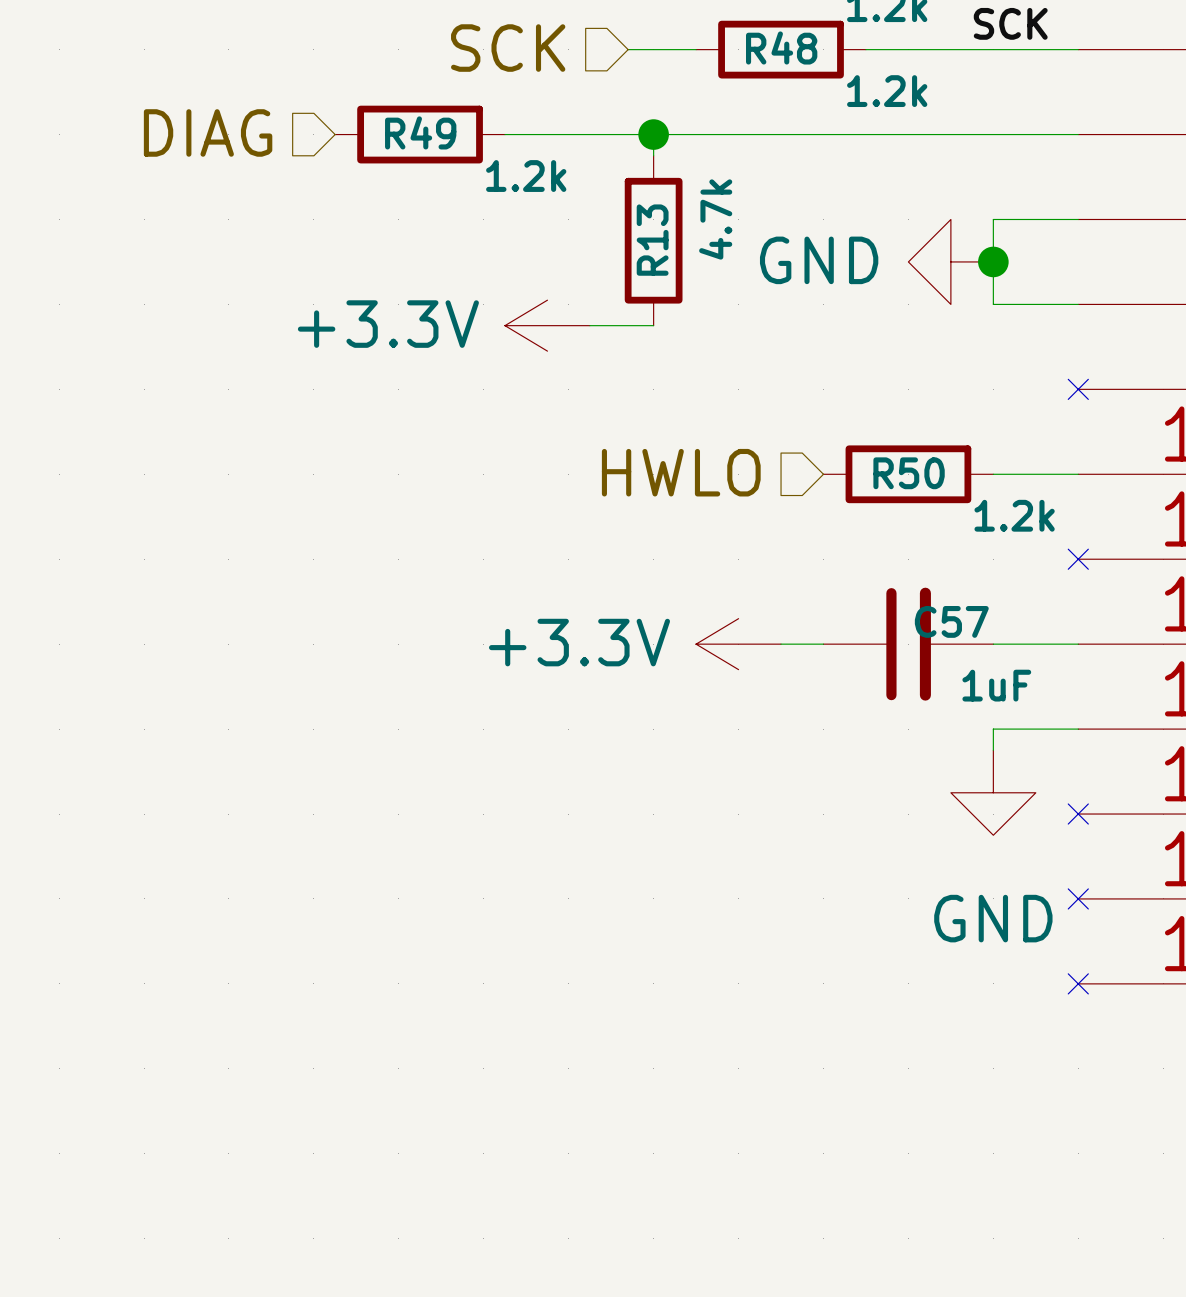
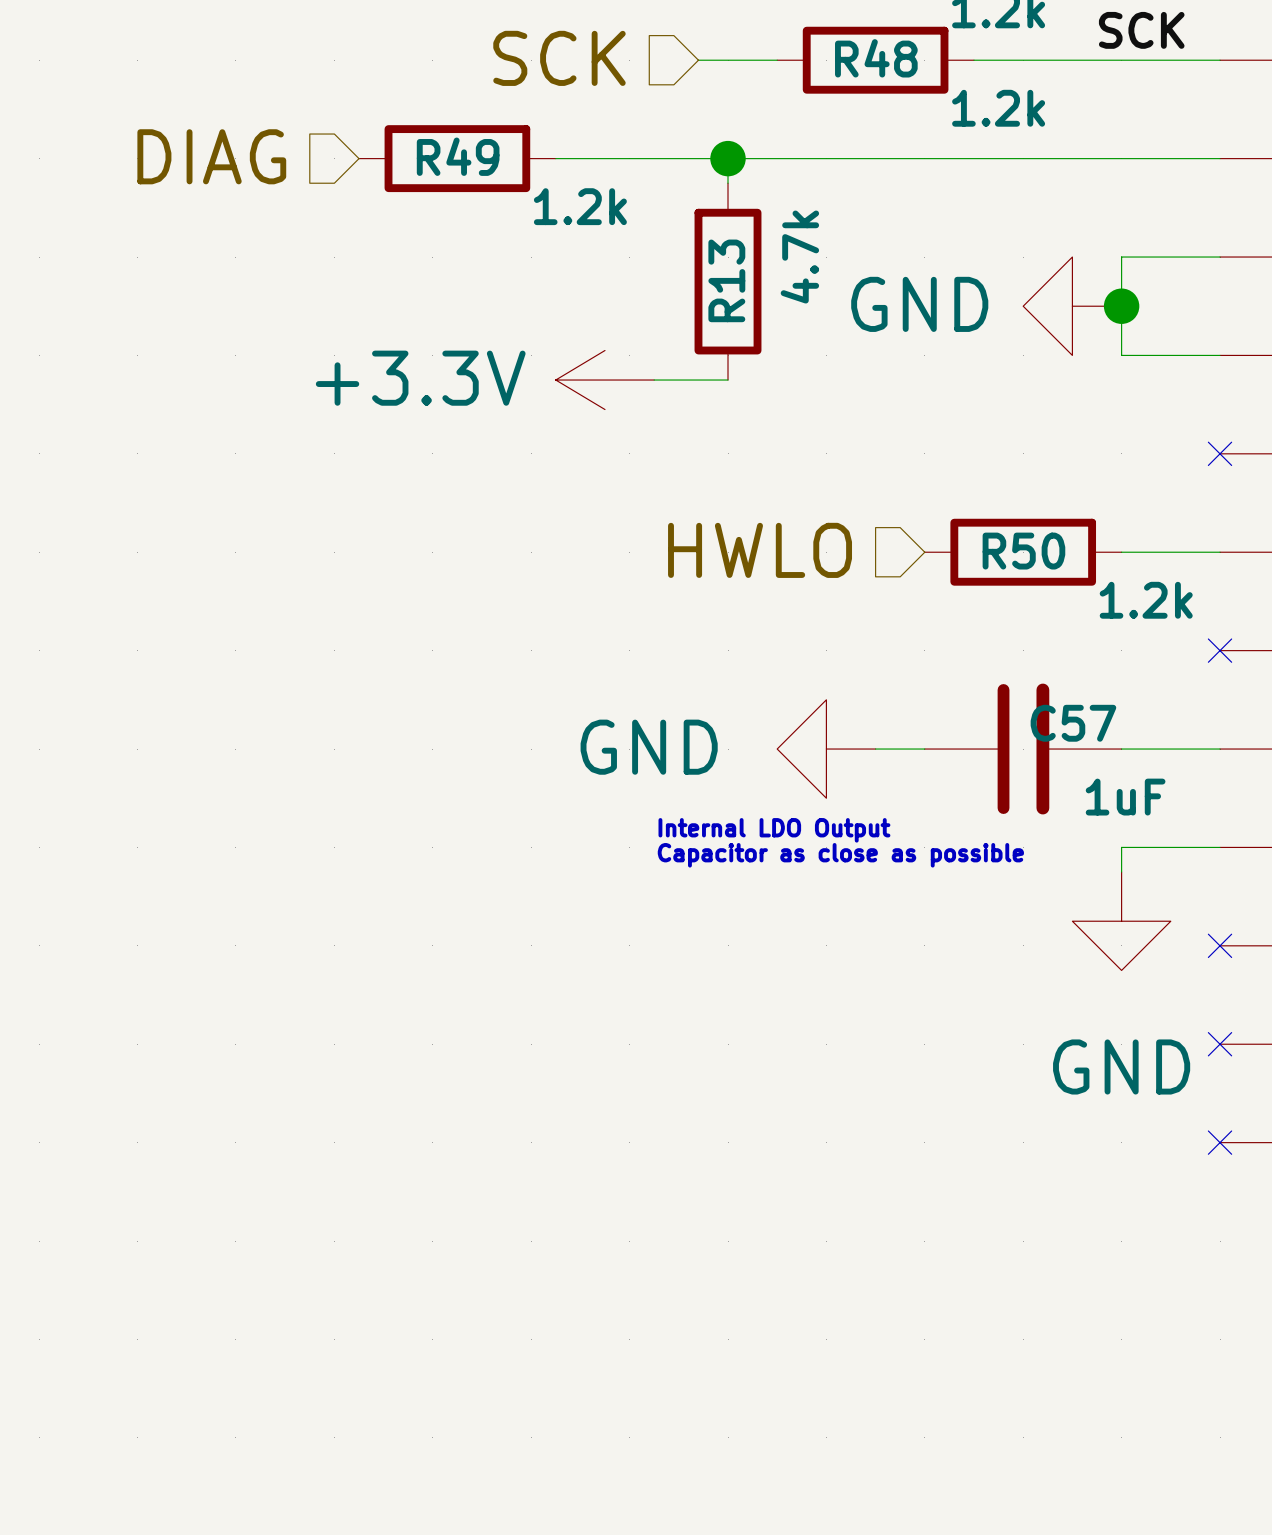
power symbol: +3.3V (738, 644) -> GND (826, 749)
text: none -> Internal LDO Output (774, 830)
text: none -> Capacitor as close as possible (840, 855)

